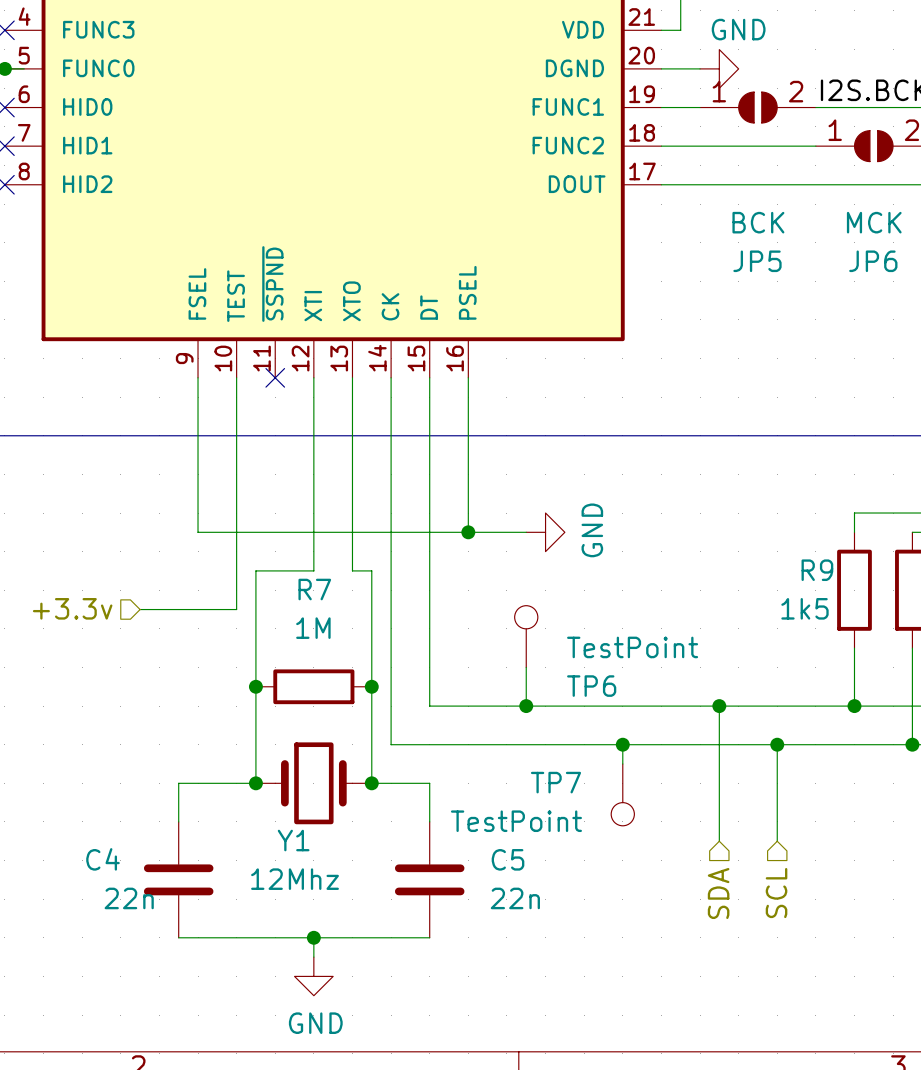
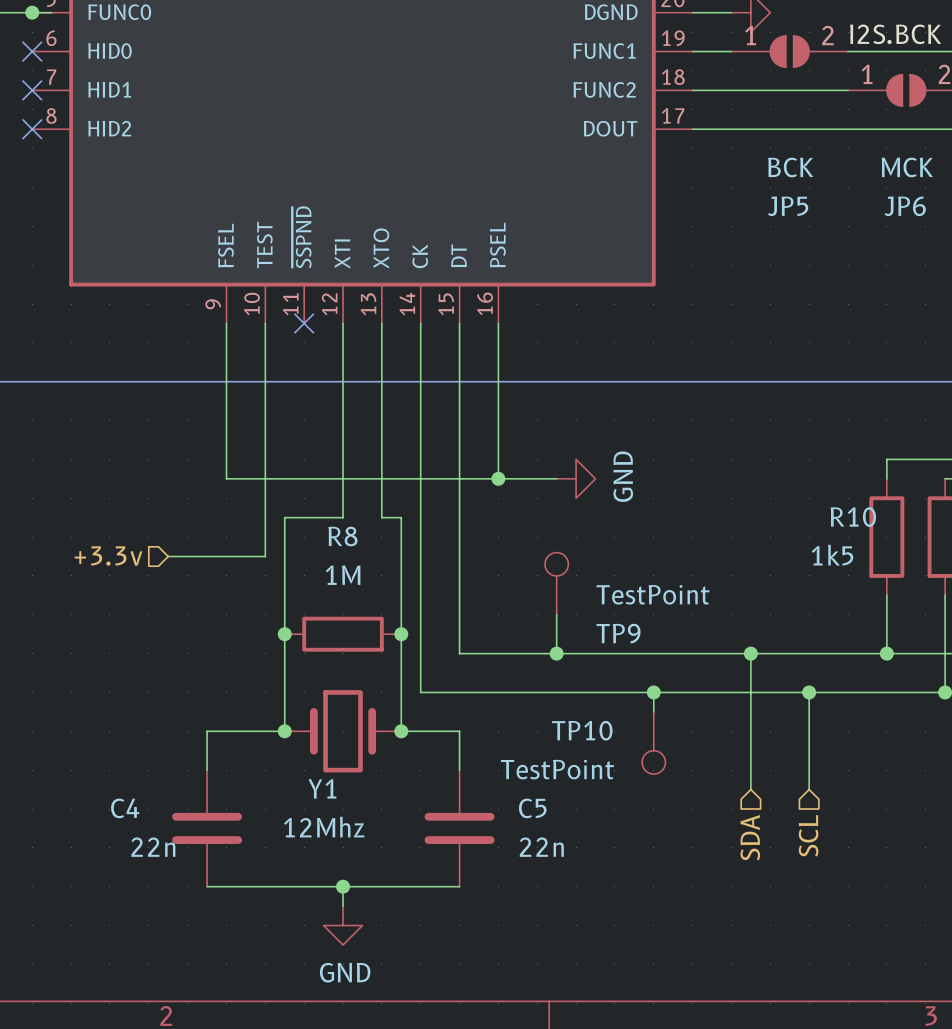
R9 name: R9 (817, 570) -> R10 (853, 517)
R7 name: R7 (314, 589) -> R8 (342, 536)
TP6 name: TP6 (591, 686) -> TP9 (618, 633)
TP7 name: TP7 (555, 782) -> TP10 (582, 730)

